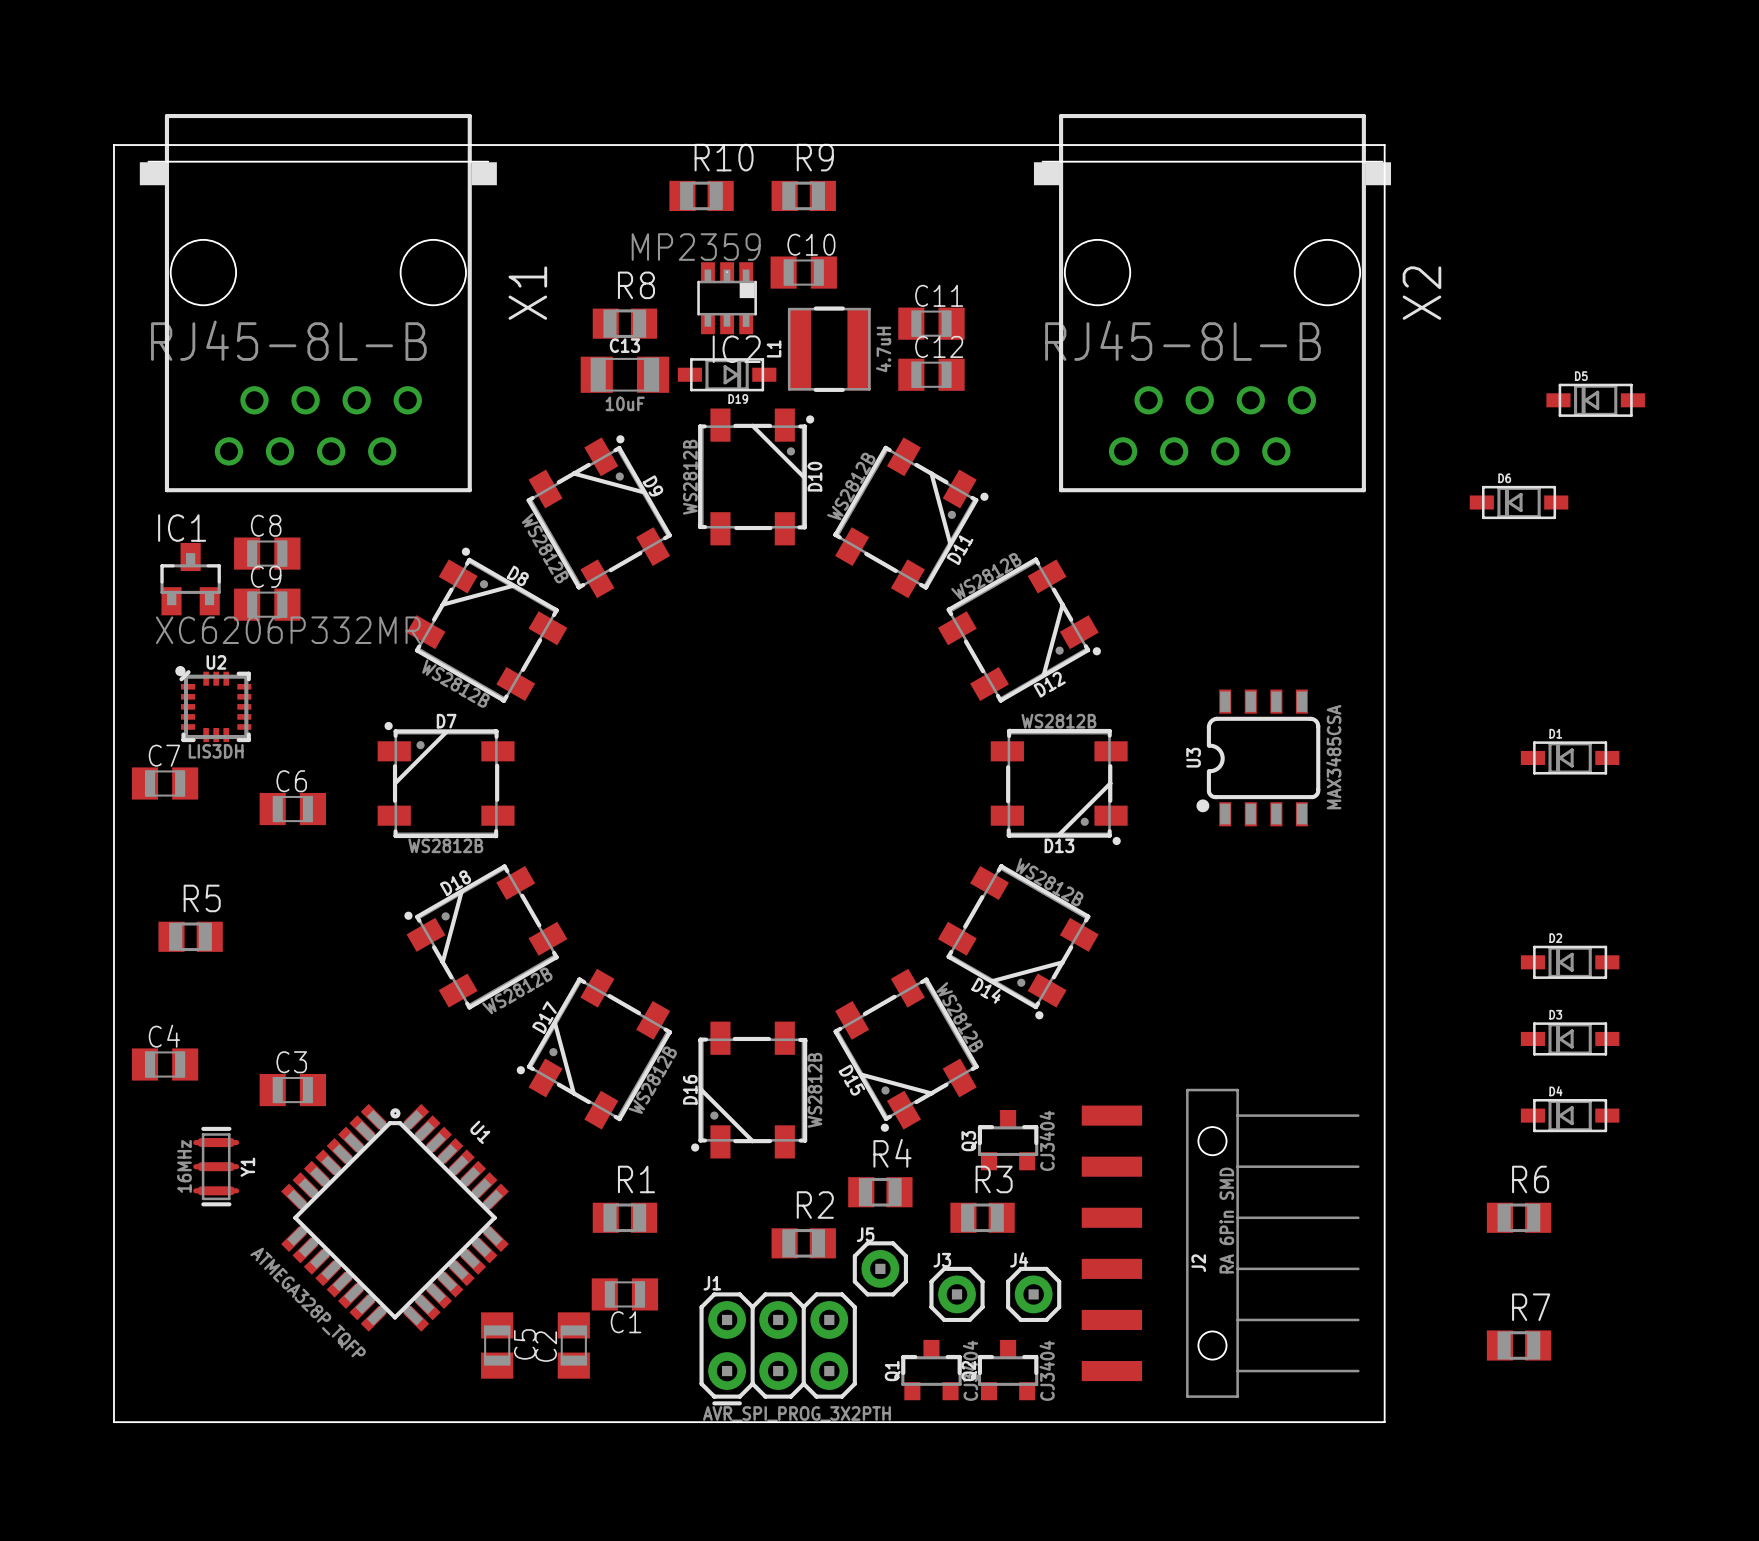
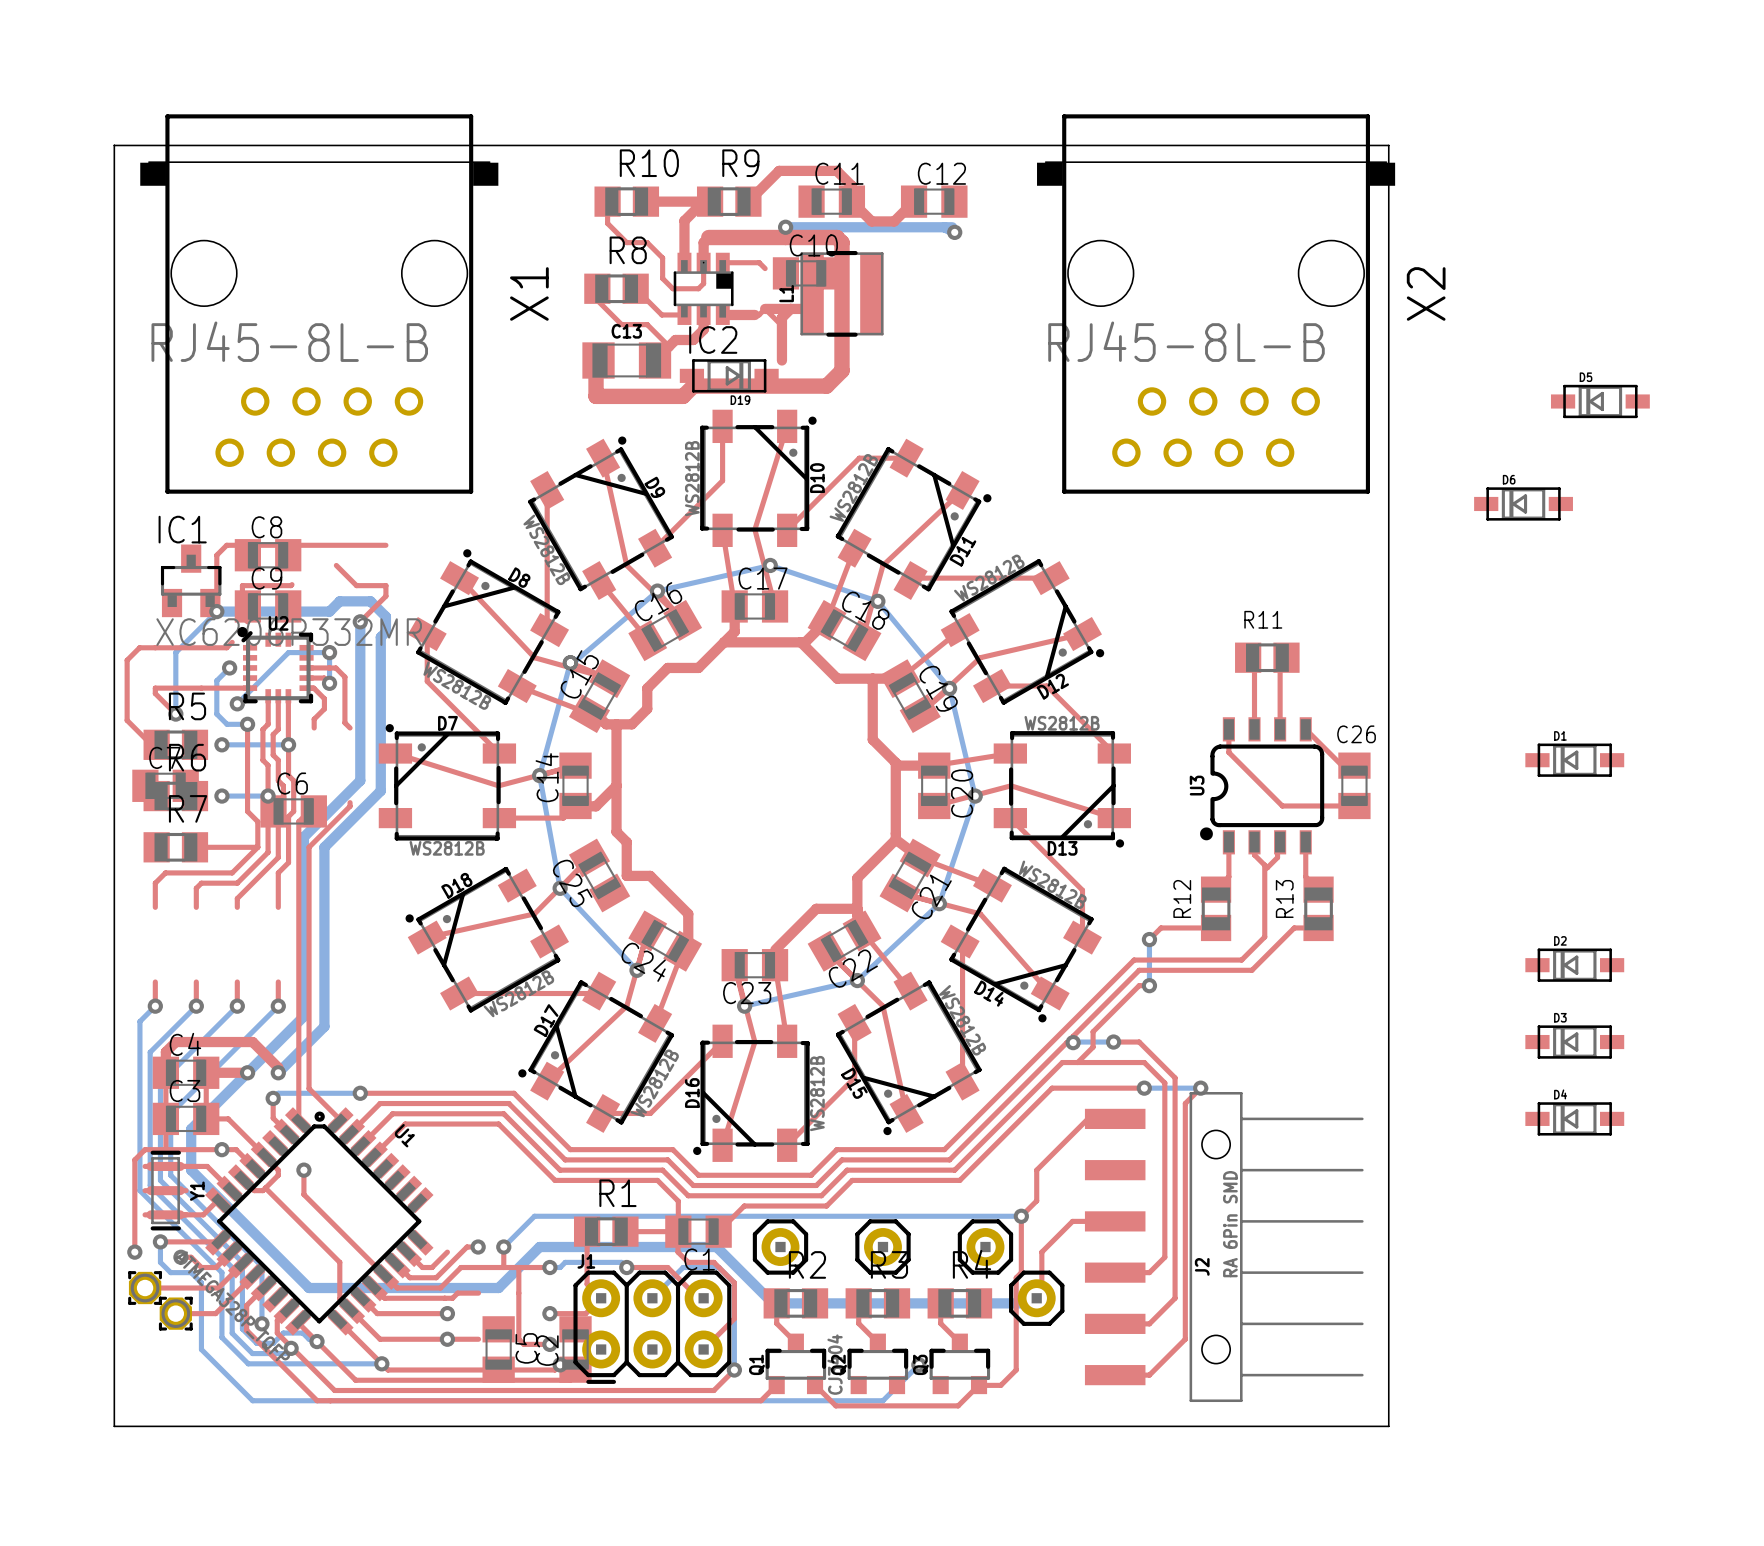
R10 position: (701, 195) -> (626, 201)
R9 position: (803, 195) -> (729, 201)
top track: none -> (607, 201) (607, 223) (626, 242) (647, 242) (662, 258) (662, 278) (672, 288) (698, 288) (703, 283) (703, 242) (708, 237) (836, 237) (841, 242) (841, 370) (826, 386) (693, 386) (683, 396) (596, 396) (596, 362) (598, 360)
top track: none -> (645, 201) (710, 201)
top track: none -> (703, 201) (684, 220) (684, 262)
top track: none -> (748, 201) (779, 170) (836, 170) (851, 185) (851, 201) (871, 221) (894, 221) (914, 201)
bottom track: none -> (785, 227) (952, 227)
via: none -> (785, 227)
via: none -> (954, 232)
IC2 value: MP2359 (696, 247) -> none
top track: none -> (722, 262) (759, 262) (765, 268)
top track: none -> (597, 288) (597, 300) (621, 324) (647, 324) (669, 346)
top track: none -> (635, 288) (661, 314) (684, 314)
IC2 position: (727, 298) -> (703, 288)
top track: none -> (811, 304) (806, 308) (765, 308)
top track: none -> (765, 308) (759, 314) (722, 314)
top track: none -> (765, 308) (781, 325) (781, 360) (781, 317) (790, 308)
top track: none -> (703, 314) (703, 329) (693, 339) (675, 339) (655, 360)
R8 position: (624, 323) -> (616, 288)
C11 position: (931, 323) -> (831, 201)
L1 position: (829, 349) -> (841, 293)
L1 value: 4.7uH (883, 349) -> none
C13 position: (624, 374) -> (626, 360)
C12 position: (931, 374) -> (934, 201)
C13 value: 10uF (625, 403) -> none
top track: none -> (722, 426) (722, 480) (655, 548)
top track: none -> (787, 426) (754, 529) (775, 606)
top track: none -> (603, 458) (626, 565) (682, 620) (657, 591)
top track: none -> (906, 458) (859, 458) (787, 530)
top track: none -> (547, 490) (547, 627) (549, 630)
top track: none -> (962, 490) (882, 565) (862, 640)
top track: none -> (722, 530) (734, 606) (734, 631) (698, 667) (667, 667) (647, 688) (647, 708) (631, 724) (606, 724) (595, 713)
top track: none -> (385, 545) (226, 545) (216, 555) (216, 611)
top track: none -> (854, 548) (827, 620) (805, 642) (724, 642)
top track: none -> (336, 565) (356, 585) (385, 585) (385, 596) (360, 621)
via: none -> (770, 565)
top track: none -> (459, 578) (534, 657) (606, 677) (570, 662)
top track: none -> (1050, 578) (912, 578) (910, 580)
top track: none -> (599, 580) (652, 645) (647, 640)
top track: none -> (291, 584) (242, 585) (242, 616) (247, 621)
via: none -> (657, 591)
via: none -> (877, 601)
C17: none -> (754, 606)
via: none -> (216, 611)
bottom track: none -> (360, 621) (360, 780) (303, 837) (303, 1016) (191, 1129) (191, 1170) (309, 1288) (498, 1288) (539, 1247) (716, 1247) (772, 1303) (1041, 1303) (1046, 1298)
via: none -> (360, 621)
C16: none -> (665, 630)
C18: none -> (844, 630)
top track: none -> (960, 630) (900, 678) (837, 678) (800, 642)
top track: none -> (427, 634) (427, 681) (499, 753)
top track: none -> (1082, 634) (980, 657) (922, 711) (949, 688)
top track: none -> (232, 642) (226, 647) (139, 647) (127, 660) (127, 720) (156, 749)
via: none -> (329, 652)
top track: none -> (1248, 657) (1254, 664) (1254, 729)
R11: none -> (1267, 657)
top track: none -> (1286, 657) (1280, 664) (1280, 729)
bottom track: none -> (570, 662) (539, 775) (560, 888) (637, 970)
via: none -> (570, 662)
bottom track: none -> (569, 666) (657, 591) (770, 565) (877, 601) (949, 688) (975, 796) (939, 903) (857, 980) (744, 1006)
bottom track: none -> (229, 667) (216, 680) (216, 714) (227, 724) (247, 724)
via: none -> (229, 667)
top track: none -> (306, 667) (335, 668) (344, 677) (344, 722) (350, 727)
top track: none -> (306, 678) (324, 678) (329, 683)
top track: none -> (872, 678) (872, 739) (898, 765) (934, 765) (1010, 753)
bottom track: none -> (329, 683) (329, 652) (288, 652) (237, 703)
via: none -> (329, 683)
top track: none -> (517, 686) (589, 713)
top track: none -> (992, 686) (1046, 686) (1114, 753)
top track: none -> (250, 688) (155, 688) (155, 693) (175, 714)
top track: none -> (306, 688) (313, 688) (324, 698) (324, 708) (314, 719) (314, 727)
via: none -> (949, 688)
top track: none -> (268, 696) (268, 724) (262, 729) (262, 760) (268, 765) (268, 852) (237, 883) (201, 883) (196, 888) (196, 907)
top track: none -> (278, 696) (278, 729) (273, 734) (273, 755) (278, 760) (278, 780) (283, 785) (283, 806) (278, 811) (278, 857) (237, 898) (237, 907)
top track: none -> (288, 696) (288, 744)
C15: none -> (599, 696)
C19: none -> (910, 696)
via: none -> (237, 703)
U2 position: (213, 704) -> (275, 665)
bottom track: none -> (175, 714) (175, 652) (216, 611) (329, 611) (339, 601) (370, 601) (385, 616) (385, 632) (380, 637) (380, 790) (324, 847) (324, 1026) (278, 1072)
via: none -> (175, 714)
top track: none -> (247, 724) (247, 811) (257, 821) (257, 847)
via: none -> (247, 724)
top track: none -> (616, 724) (616, 831) (626, 842) (626, 875) (650, 875) (688, 913) (688, 945)
top track: none -> (1228, 729) (1228, 752) (1282, 805) (1354, 805)
top track: none -> (1305, 729) (1342, 765) (1354, 765)
bottom track: none -> (221, 744) (288, 744)
via: none -> (221, 744)
top track: none -> (288, 744) (288, 775) (293, 780) (293, 811) (288, 816) (288, 862) (278, 872) (278, 907)
via: none -> (288, 744)
U2 value: LIS3DH (216, 751) -> none
top track: none -> (404, 753) (395, 753) (498, 785) (575, 765) (539, 775)
U3 position: (1258, 757) -> (1262, 785)
U3 value: MAX3485CSA (1333, 757) -> none
top track: none -> (895, 762) (895, 839)
via: none -> (539, 775)
C14: none -> (575, 785)
top track: none -> (616, 785) (596, 806) (575, 806)
C20: none -> (934, 785)
C26: none -> (1354, 785)
bottom track: none -> (221, 796) (268, 796)
via: none -> (221, 796)
via: none -> (268, 796)
via: none -> (975, 796)
top track: none -> (314, 802) (314, 806) (298, 821) (298, 1120)
top track: none -> (350, 802) (350, 806) (309, 847) (309, 1088) (340, 1120)
top track: none -> (575, 805) (563, 818) (499, 818)
top track: none -> (934, 805) (1011, 785) (1114, 818)
top track: none -> (1010, 818) (1082, 890) (1082, 937)
top track: none -> (895, 839) (857, 878) (857, 926)
top track: none -> (895, 839) (920, 858) (992, 885)
top track: none -> (1228, 842) (1228, 876) (1216, 889)
top track: none -> (1254, 842) (1254, 854) (1267, 867) (1277, 857) (1277, 844) (1280, 842)
top track: none -> (1305, 842) (1305, 876) (1318, 889)
top track: none -> (194, 847) (257, 847)
top track: none -> (257, 847) (232, 872) (165, 872) (155, 883) (155, 907)
top track: none -> (589, 858) (534, 913) (427, 937)
top track: none -> (1264, 865) (1264, 936) (1241, 960) (1134, 960) (944, 1149) (836, 1149) (811, 1175) (698, 1175) (672, 1149) (570, 1149) (514, 1093) (360, 1093)
C25: none -> (599, 875)
C21: none -> (910, 875)
via: none -> (560, 888)
top track: none -> (939, 903) (904, 894) (980, 913) (1050, 993)
via: none -> (939, 903)
R12: none -> (1216, 908)
R13: none -> (1318, 908)
top track: none -> (1216, 927) (1161, 927) (1149, 939)
top track: none -> (1318, 927) (1294, 927) (1251, 970) (1139, 970) (1073, 1036) (1073, 1042) (1066, 1042) (949, 1159) (841, 1159) (816, 1185) (693, 1185) (667, 1159) (565, 1159) (508, 1103) (380, 1103) (352, 1131)
top track: none -> (862, 931) (910, 991)
top track: none -> (862, 931) (857, 908) (816, 908) (775, 949)
R5 position: (190, 936) -> (175, 744)
bottom track: none -> (1149, 939) (1149, 985)
via: none -> (1149, 939)
C24: none -> (665, 941)
C22: none -> (844, 941)
top track: none -> (960, 941) (962, 943) (962, 1081)
top track: none -> (682, 951) (655, 1023)
C23: none -> (754, 965)
top track: none -> (775, 965) (787, 1041)
top track: none -> (637, 970) (647, 931) (626, 1006) (547, 1081)
via: none -> (637, 970)
top track: none -> (857, 980) (827, 951) (882, 1006) (906, 1113)
via: none -> (857, 980)
top track: none -> (155, 981) (155, 1006)
top track: none -> (196, 981) (196, 1006)
top track: none -> (237, 981) (237, 1006)
top track: none -> (278, 981) (278, 1006)
top track: none -> (1149, 985) (1139, 985) (1093, 1031) (1093, 1047) (1077, 1062)
via: none -> (1149, 985)
top track: none -> (599, 991) (596, 993) (459, 993)
bottom track: none -> (155, 1006) (139, 1021) (139, 1190) (221, 1272) (221, 1337) (248, 1363) (381, 1363)
via: none -> (155, 1006)
bottom track: none -> (196, 1006) (150, 1052) (150, 1185) (232, 1267) (232, 1333) (252, 1353) (285, 1353) (291, 1348)
via: none -> (196, 1006)
bottom track: none -> (237, 1006) (160, 1083) (160, 1180) (242, 1262) (242, 1329) (256, 1343) (273, 1343) (283, 1333) (302, 1333) (309, 1339) (314, 1339) (316, 1341)
via: none -> (237, 1006)
bottom track: none -> (278, 1006) (170, 1113) (170, 1175) (261, 1266) (261, 1323)
via: none -> (278, 1006)
top track: none -> (744, 1006) (735, 966) (754, 1042) (722, 1145)
via: none -> (744, 1006)
top track: none -> (854, 1023) (854, 1077) (787, 1145)
top track: none -> (722, 1041) (650, 1113) (603, 1113)
top track: none -> (1113, 1042) (1139, 1042) (1175, 1077) (1175, 1298) (1149, 1323) (1115, 1323)
bottom track: none -> (1113, 1042) (1073, 1042)
via: none -> (1113, 1042)
via: none -> (1073, 1042)
C4 position: (165, 1064) -> (186, 1072)
top track: none -> (247, 1072) (206, 1072) (206, 1118) (228, 1118) (278, 1170) (278, 1175) (262, 1190) (254, 1190) (240, 1177)
via: none -> (247, 1072)
top track: none -> (278, 1072) (278, 1067) (252, 1042) (175, 1042) (165, 1051) (165, 1149)
via: none -> (278, 1072)
top track: none -> (1144, 1088) (1052, 1088) (959, 1180) (852, 1180) (826, 1206) (744, 1206) (718, 1231)
bottom track: none -> (1144, 1088) (1205, 1088)
via: none -> (1144, 1088)
top track: none -> (1200, 1088) (1185, 1103) (1185, 1339) (1149, 1375) (1115, 1375)
via: none -> (1200, 1088)
C3 position: (292, 1090) -> (186, 1118)
bottom track: none -> (360, 1093) (278, 1093) (273, 1098)
via: none -> (360, 1093)
top track: none -> (273, 1098) (273, 1118) (286, 1131)
via: none -> (273, 1098)
top track: none -> (1115, 1118) (1087, 1118) (1036, 1170) (1036, 1200) (1021, 1216) (1021, 1272) (1016, 1277) (1016, 1370) (1000, 1385) (979, 1385) (958, 1405) (835, 1405) (815, 1385)
top track: none -> (363, 1143) (392, 1113) (503, 1113) (560, 1170) (662, 1170) (688, 1195) (821, 1195) (847, 1170) (954, 1170) (1062, 1062) (1144, 1062) (1164, 1083) (1164, 1257) (1149, 1272) (1115, 1272)
Q3 position: (1008, 1140) -> (959, 1363)
Q3 value: CJ3404 (1047, 1140) -> none
via: none -> (221, 1149)
top track: none -> (374, 1154) (405, 1124) (498, 1124) (555, 1180) (657, 1180) (678, 1201) (678, 1231)
top track: none -> (165, 1166) (207, 1166) (229, 1188)
top track: none -> (252, 1165) (236, 1149) (145, 1149) (134, 1159) (134, 1252)
Y1 value: 16MHz (184, 1166) -> none
Y1 position: (216, 1166) -> (165, 1190)
top track: none -> (303, 1170) (303, 1194) (397, 1288) (440, 1288) (461, 1267) (549, 1267)
via: none -> (303, 1170)
top track: none -> (265, 1188) (339, 1262) (339, 1298) (380, 1339) (478, 1339)
R4 position: (880, 1192) -> (959, 1303)
top track: none -> (218, 1200) (203, 1214) (165, 1214)
bottom track: none -> (1021, 1216) (534, 1216) (503, 1247)
via: none -> (1021, 1216)
U1 position: (395, 1217) -> (319, 1221)
R1 position: (624, 1217) -> (606, 1231)
R3 position: (982, 1217) -> (877, 1303)
top track: none -> (1115, 1221) (1072, 1221) (1041, 1252) (1041, 1293) (1046, 1298)
R6 position: (1519, 1217) -> (175, 796)
top track: none -> (587, 1231) (587, 1284) (601, 1298) (585, 1313) (549, 1313)
top track: none -> (625, 1231) (678, 1231)
top track: none -> (678, 1231) (678, 1252) (688, 1262) (713, 1262) (734, 1282) (734, 1318) (703, 1349)
top track: none -> (160, 1241) (218, 1242)
bottom track: none -> (160, 1241) (160, 1262) (170, 1272) (191, 1272) (201, 1282) (201, 1349) (252, 1400) (882, 1400) (918, 1364)
via: none -> (160, 1241)
top track: none -> (478, 1247) (467, 1247) (436, 1277) (409, 1277) (397, 1265)
via: none -> (478, 1247)
top track: none -> (503, 1247) (503, 1267)
via: none -> (503, 1247)
part: none -> (780, 1247)
R2 position: (803, 1243) -> (795, 1303)
part: none -> (882, 1247)
part: none -> (985, 1247)
via: none -> (134, 1252)
top track: none -> (447, 1252) (432, 1267) (422, 1267) (409, 1254)
top track: none -> (229, 1254) (216, 1267) (201, 1267) (191, 1257) (180, 1257)
via: none -> (180, 1257)
J4 name: J4 (1019, 1259) -> none
top track: none -> (240, 1265) (218, 1288) (145, 1288)
top track: none -> (519, 1267) (518, 1339) (523, 1344) (549, 1344)
bottom track: none -> (549, 1267) (560, 1267) (565, 1262) (621, 1262) (626, 1267)
via: none -> (549, 1267)
top track: none -> (626, 1267) (667, 1267) (698, 1298) (703, 1298)
via: none -> (626, 1267)
J5: (880, 1268) -> none
top track: none -> (252, 1276) (215, 1313) (175, 1313)
part: none -> (145, 1288)
top track: none -> (263, 1288) (246, 1305) (246, 1330) (317, 1400) (761, 1400) (776, 1385)
top track: none -> (374, 1288) (384, 1298) (452, 1298) (457, 1293) (478, 1293)
C1 position: (624, 1294) -> (698, 1231)
bottom track: none -> (652, 1298) (683, 1267) (719, 1267) (734, 1282) (734, 1370)
J3: (957, 1294) -> none
top track: none -> (363, 1299) (377, 1313) (447, 1313)
top track: none -> (776, 1303) (776, 1323) (795, 1342)
top track: none -> (858, 1303) (858, 1323) (877, 1342)
top track: none -> (940, 1303) (940, 1323) (959, 1342)
top track: none -> (286, 1311) (277, 1320) (277, 1333) (334, 1390) (713, 1390) (734, 1370)
part: none -> (175, 1313)
via: none -> (447, 1313)
via: none -> (549, 1313)
top track: none -> (298, 1322) (355, 1380) (570, 1380) (601, 1349)
top track: none -> (340, 1322) (388, 1370) (555, 1370) (560, 1364)
via: none -> (261, 1323)
via: none -> (447, 1339)
via: none -> (316, 1341)
via: none -> (549, 1344)
via: none -> (291, 1348)
R7 position: (1519, 1345) -> (175, 847)
J1 position: (778, 1348) -> (652, 1327)
via: none -> (381, 1363)
via: none -> (560, 1364)
via: none -> (918, 1364)
via: none -> (734, 1370)
Q1 position: (931, 1370) -> (795, 1363)
Q2 position: (1008, 1370) -> (877, 1363)
Q2 value: CJ3404 (1047, 1370) -> none
J1 value: AVR_SPI_PROG_3X2PTH (796, 1414) -> none

